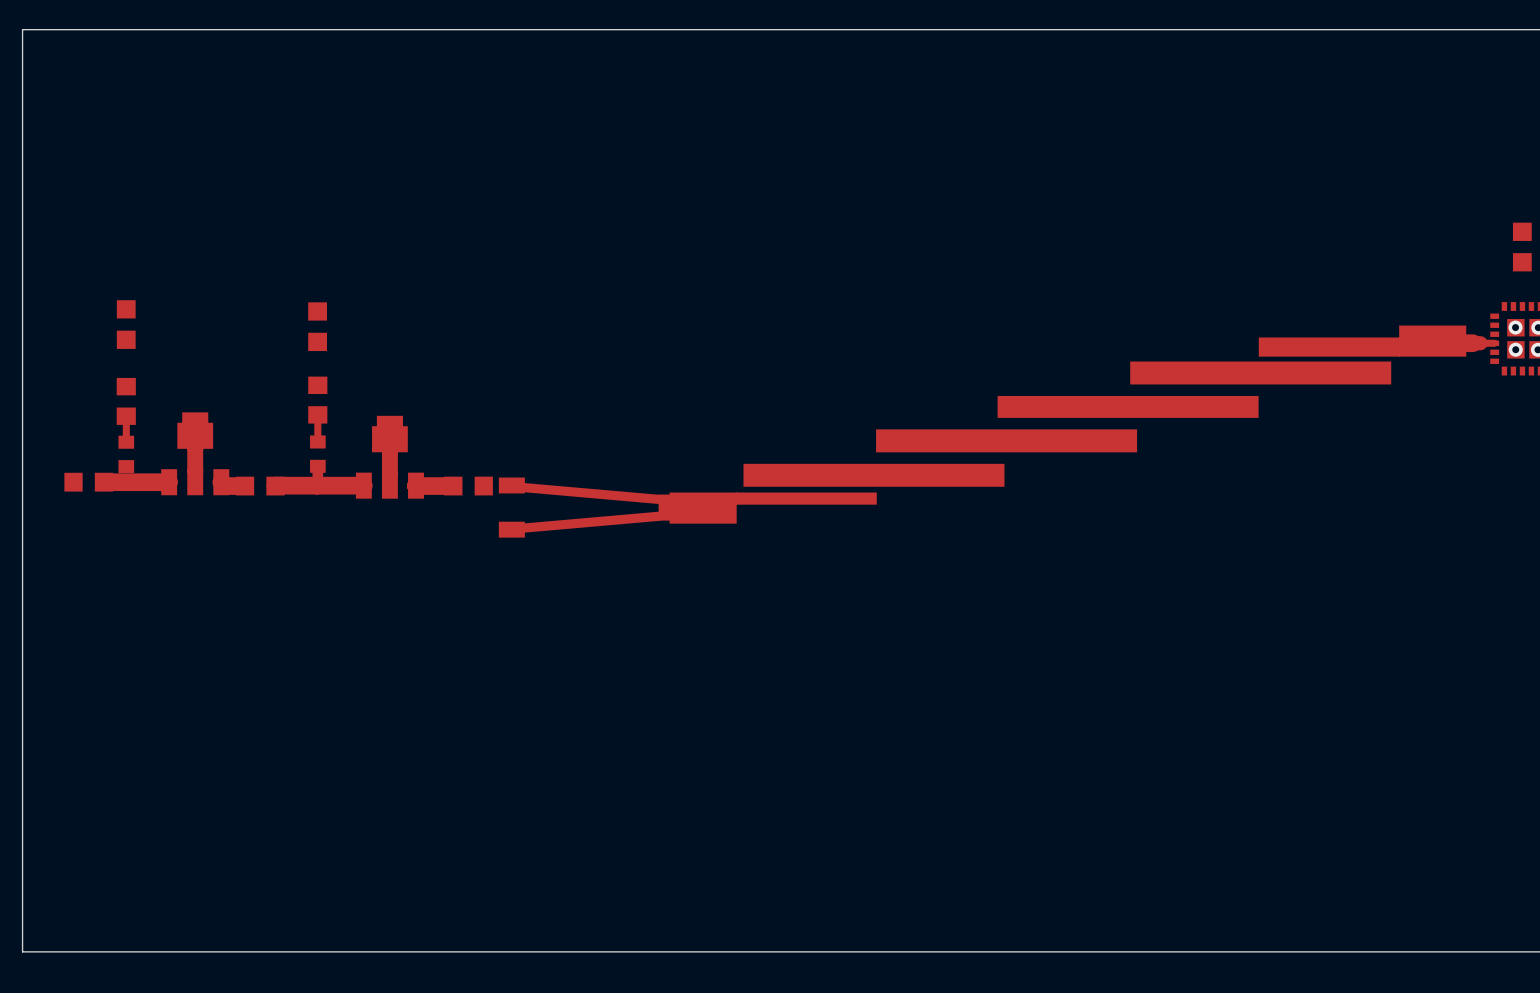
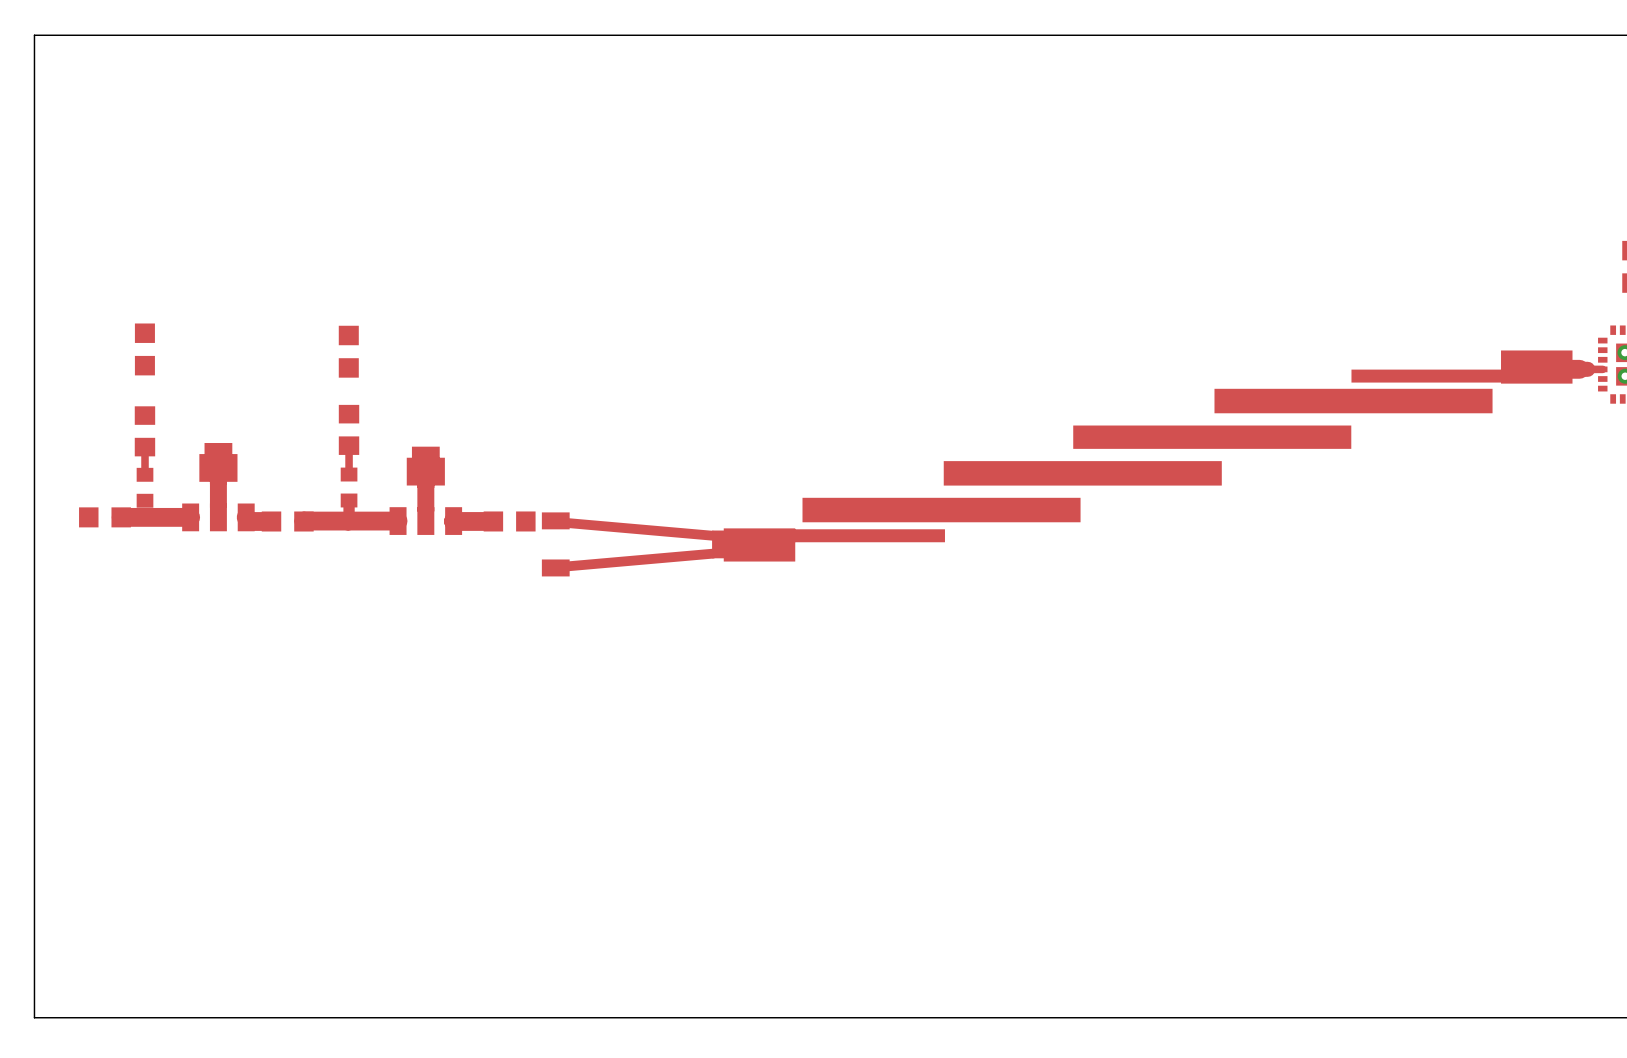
part footprint: [669, 325, 1467, 524] -> [723, 350, 1573, 562]

